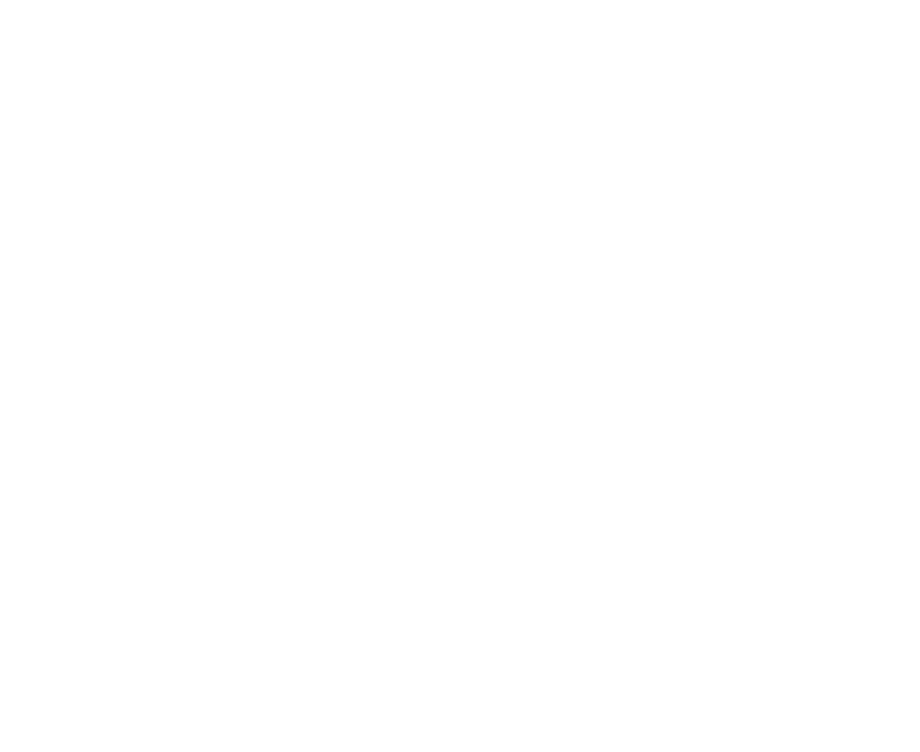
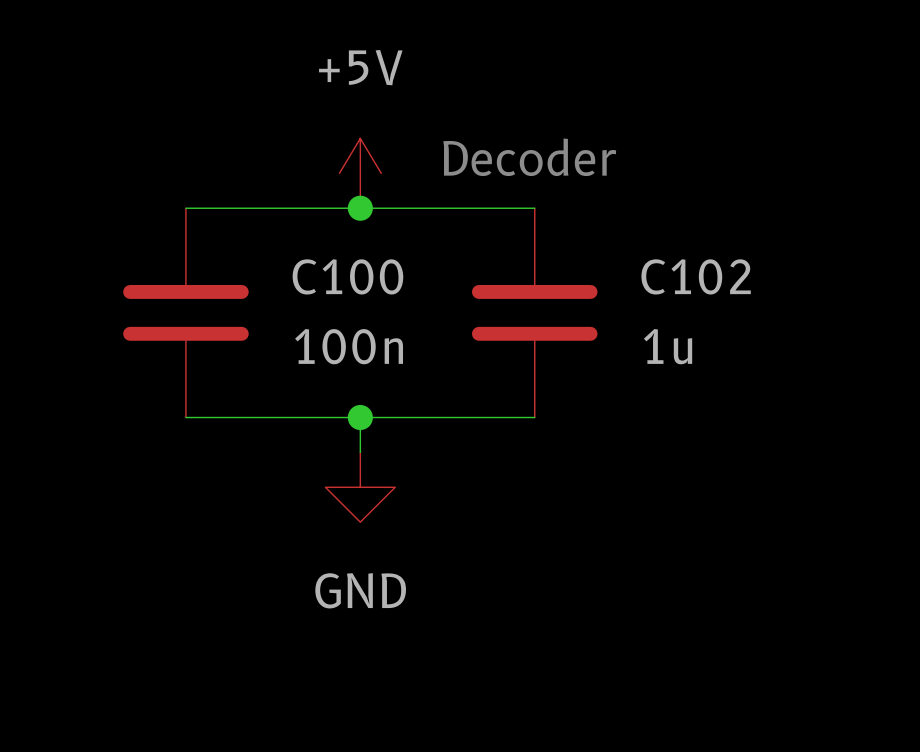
text: none -> Decoder (529, 157)
power symbol: none -> +5V (360, 173)
wire: none -> (185, 208) (534, 208)
junction: none -> (360, 208)
C100: none -> 100n (185, 312)
C102: none -> 1u (534, 312)
wire: none -> (185, 417) (534, 417)
wire: none -> (360, 417) (360, 452)
junction: none -> (360, 417)
power symbol: none -> GND (360, 487)

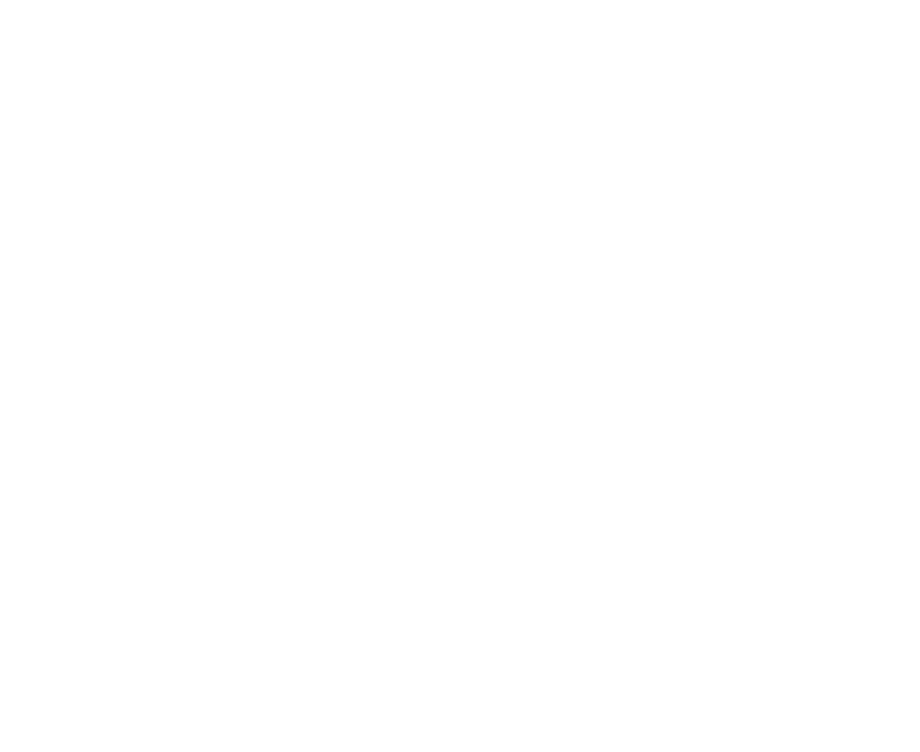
text: Decoder (529, 157) -> none
power symbol: +5V (360, 173) -> none
wire: (185, 208) (534, 208) -> none
junction: (360, 208) -> none
C100: 100n (185, 312) -> none
C102: 1u (534, 312) -> none
wire: (185, 417) (534, 417) -> none
wire: (360, 417) (360, 452) -> none
junction: (360, 417) -> none
power symbol: GND (360, 487) -> none

